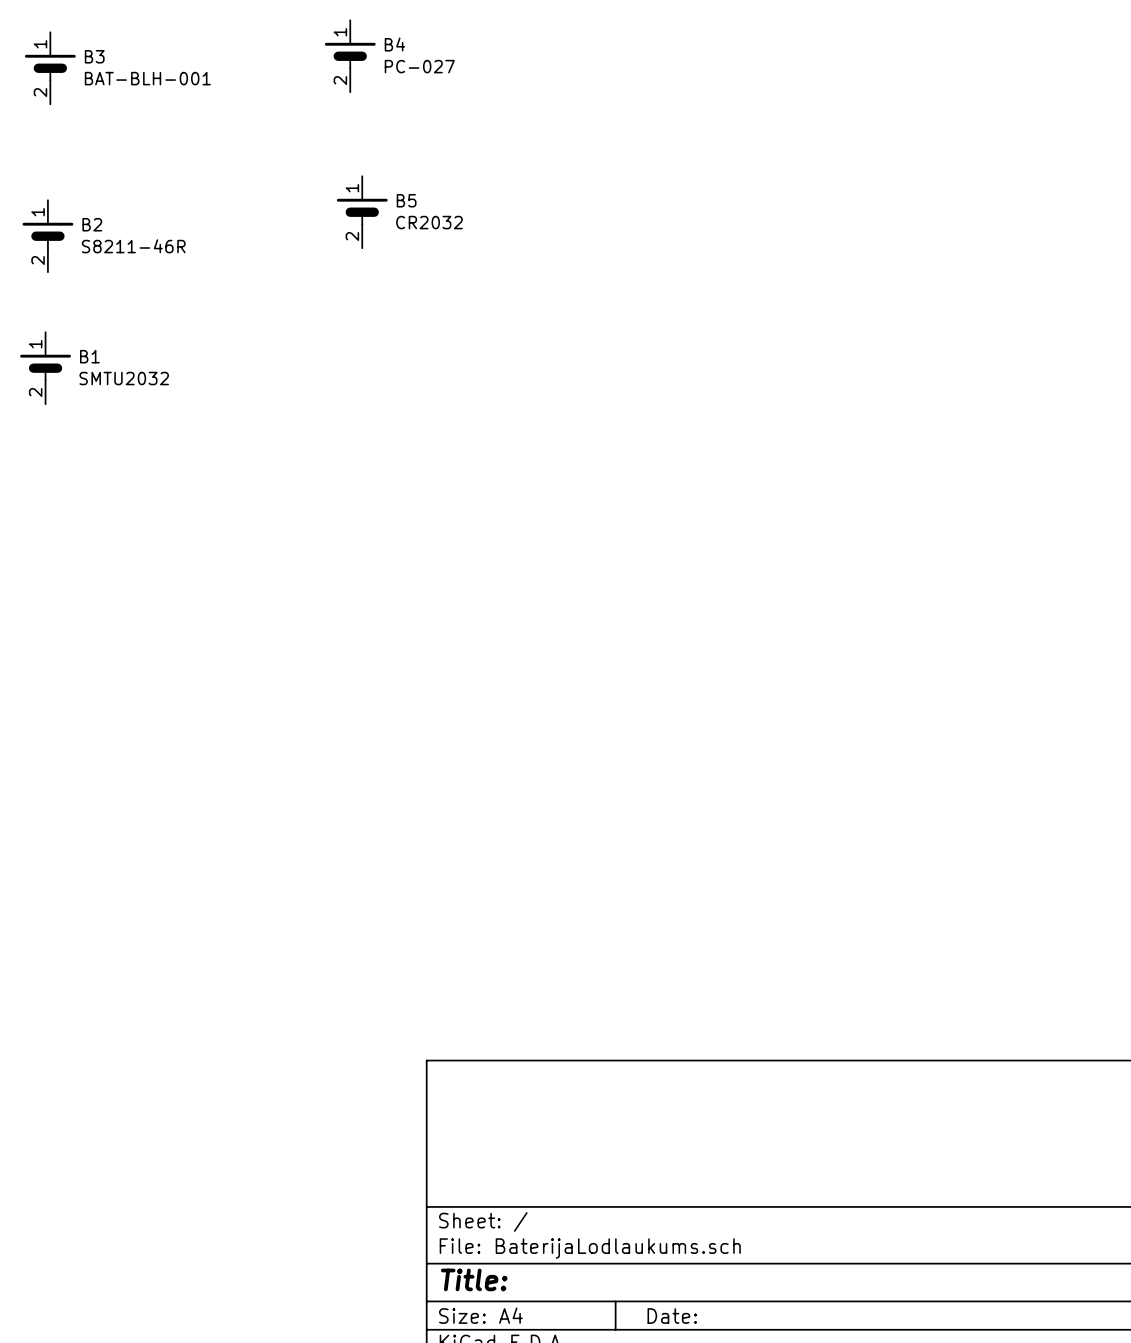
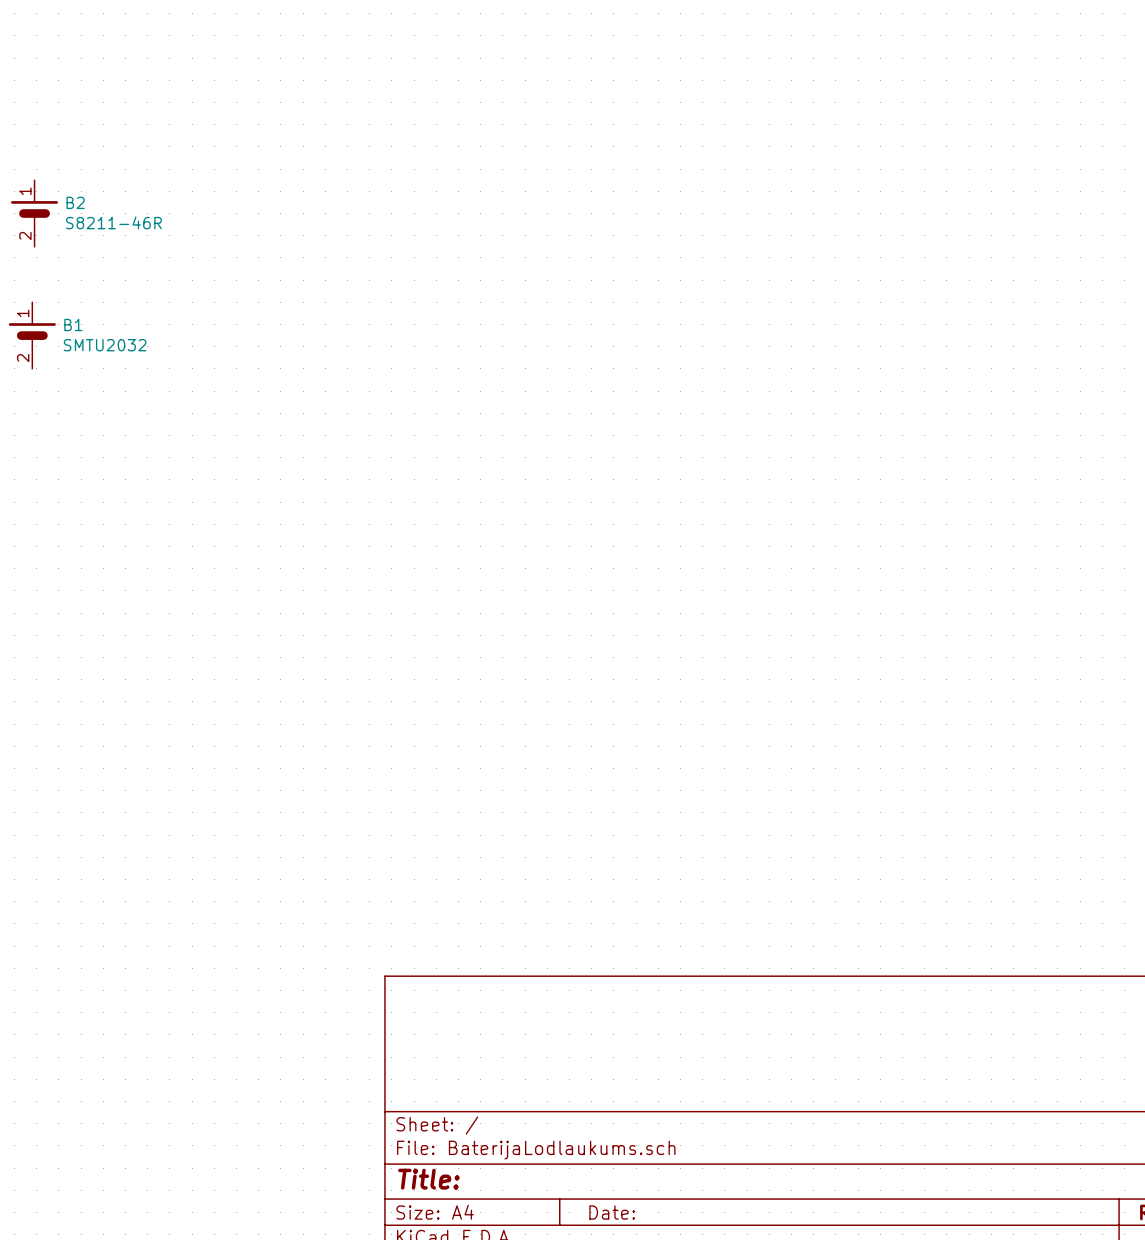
B4: PC-027 (350, 56) -> none
B3: BAT-BLH-001 (50, 68) -> none
B5: CR2032 (362, 212) -> none

